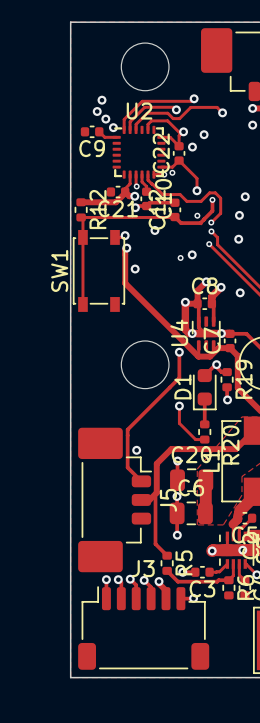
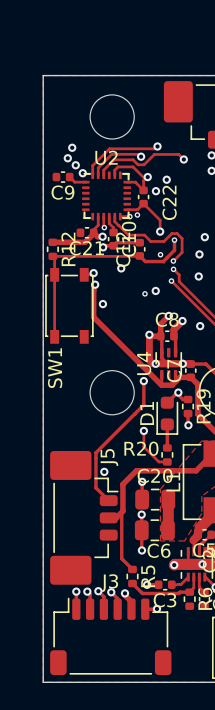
C22 name position: C22 (161, 153) -> C22 (169, 202)
SW1 name position: SW1 (59, 270) -> SW1 (55, 368)
R20 name rotation: 0° (230, 445) -> 90° clockwise (141, 448)
R20 name position: R20 (230, 445) -> R20 (141, 448)
C6 name position: C6 (191, 487) -> C6 (158, 550)
J5 name position: J5 (168, 500) -> J5 (109, 457)

